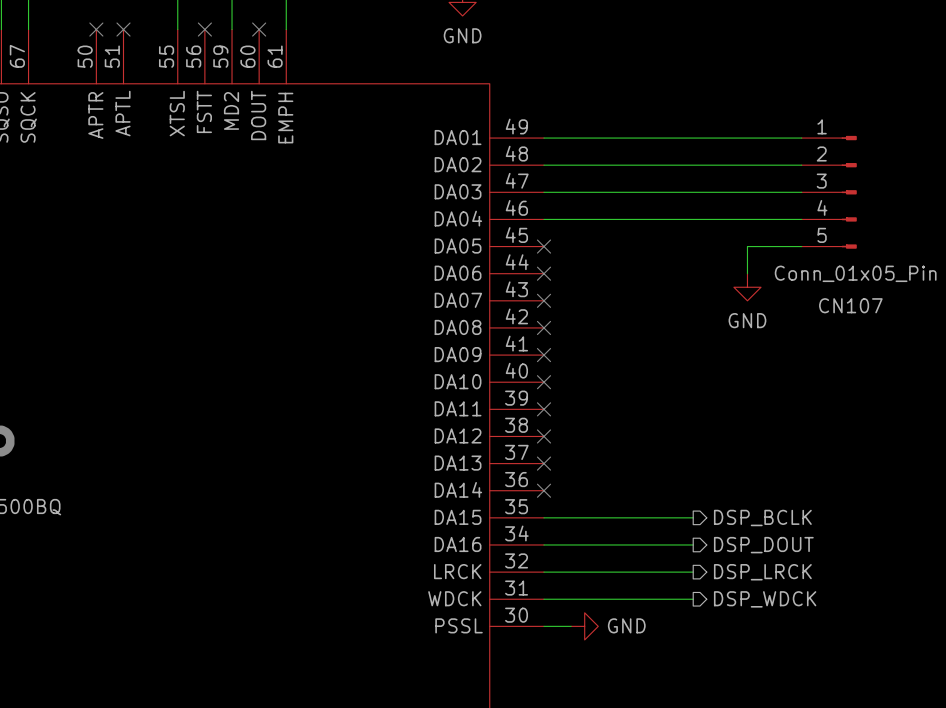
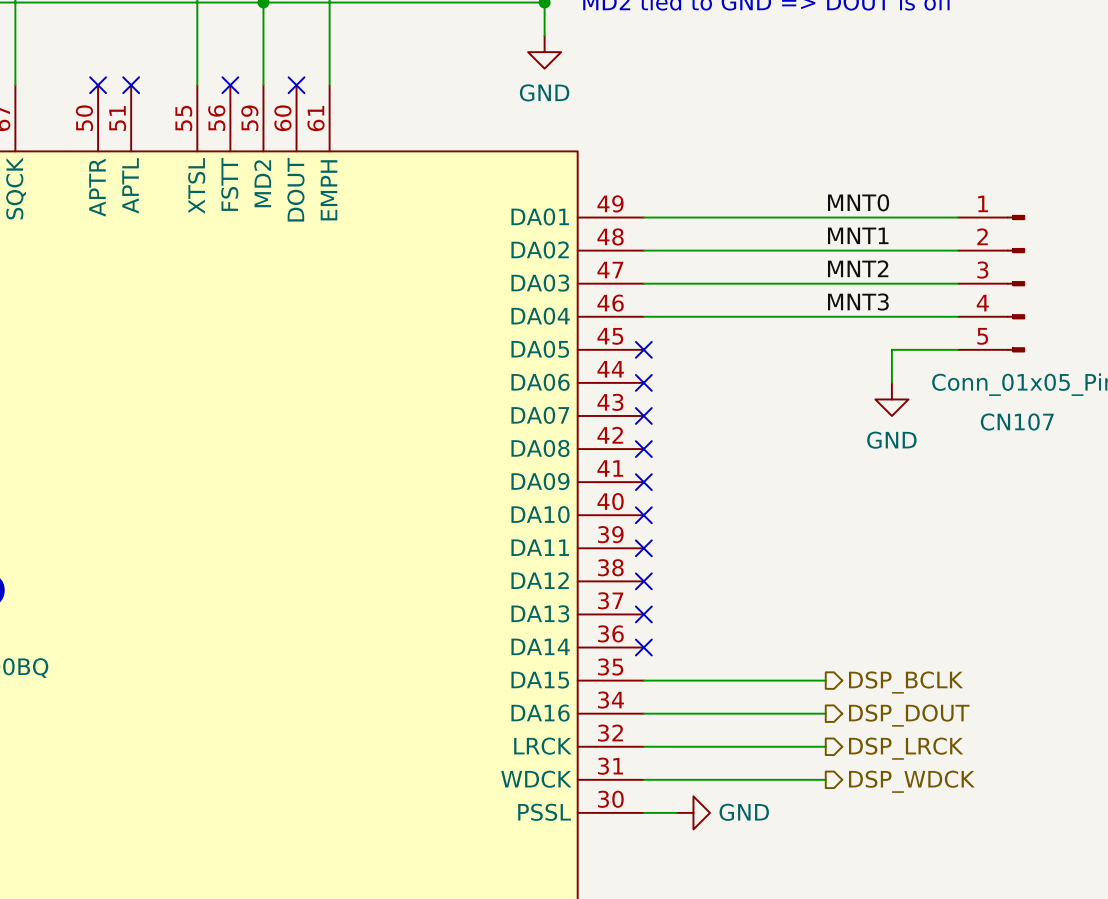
label: none -> MNT0 (858, 202)
label: none -> MNT1 (858, 235)
label: none -> MNT2 (858, 268)
label: none -> MNT3 (858, 302)

